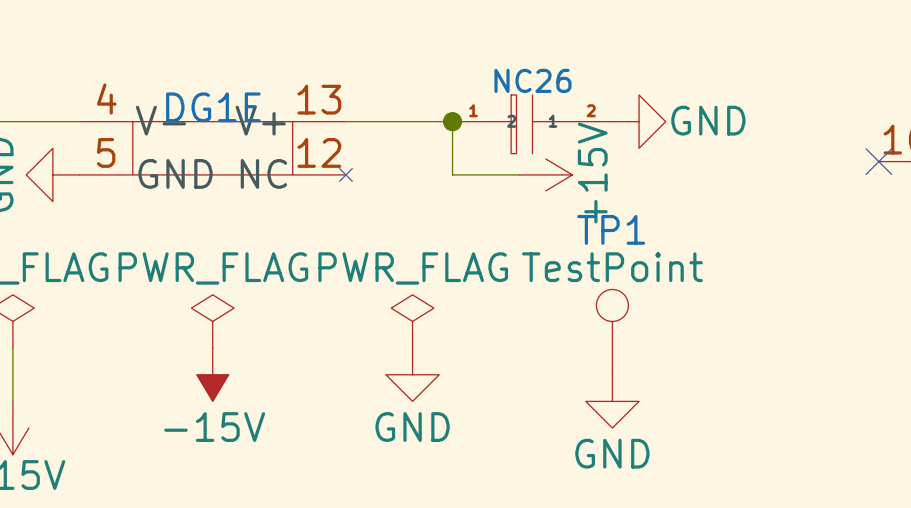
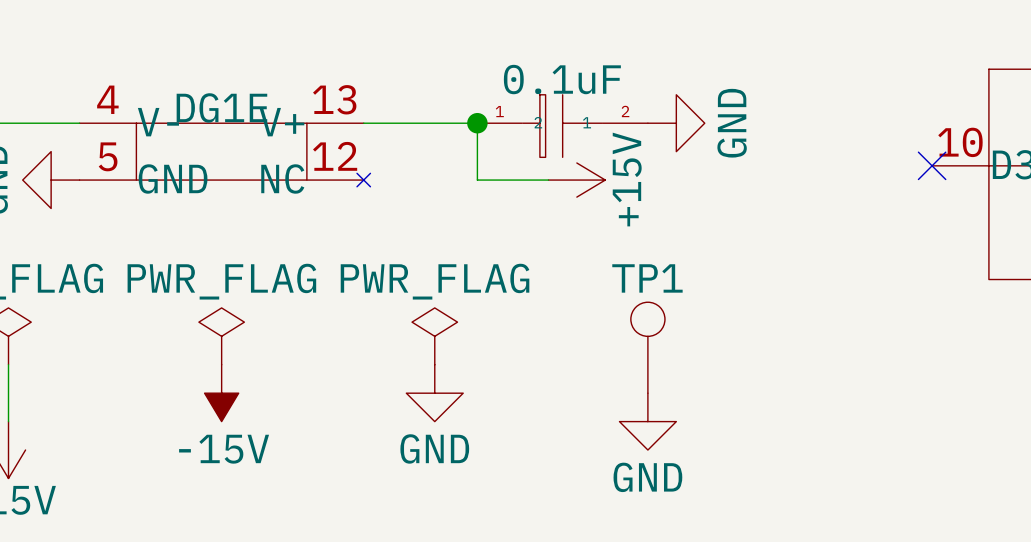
NC26 name: NC26 (532, 80) -> none
NC26 value: none -> 0.1uF (562, 79)
power symbol text rotation: 0° (708, 120) -> 90° counterclockwise (732, 123)
TP1 name position: TP1 (611, 229) -> TP1 (647, 278)
TP1 value: TestPoint (612, 267) -> none

